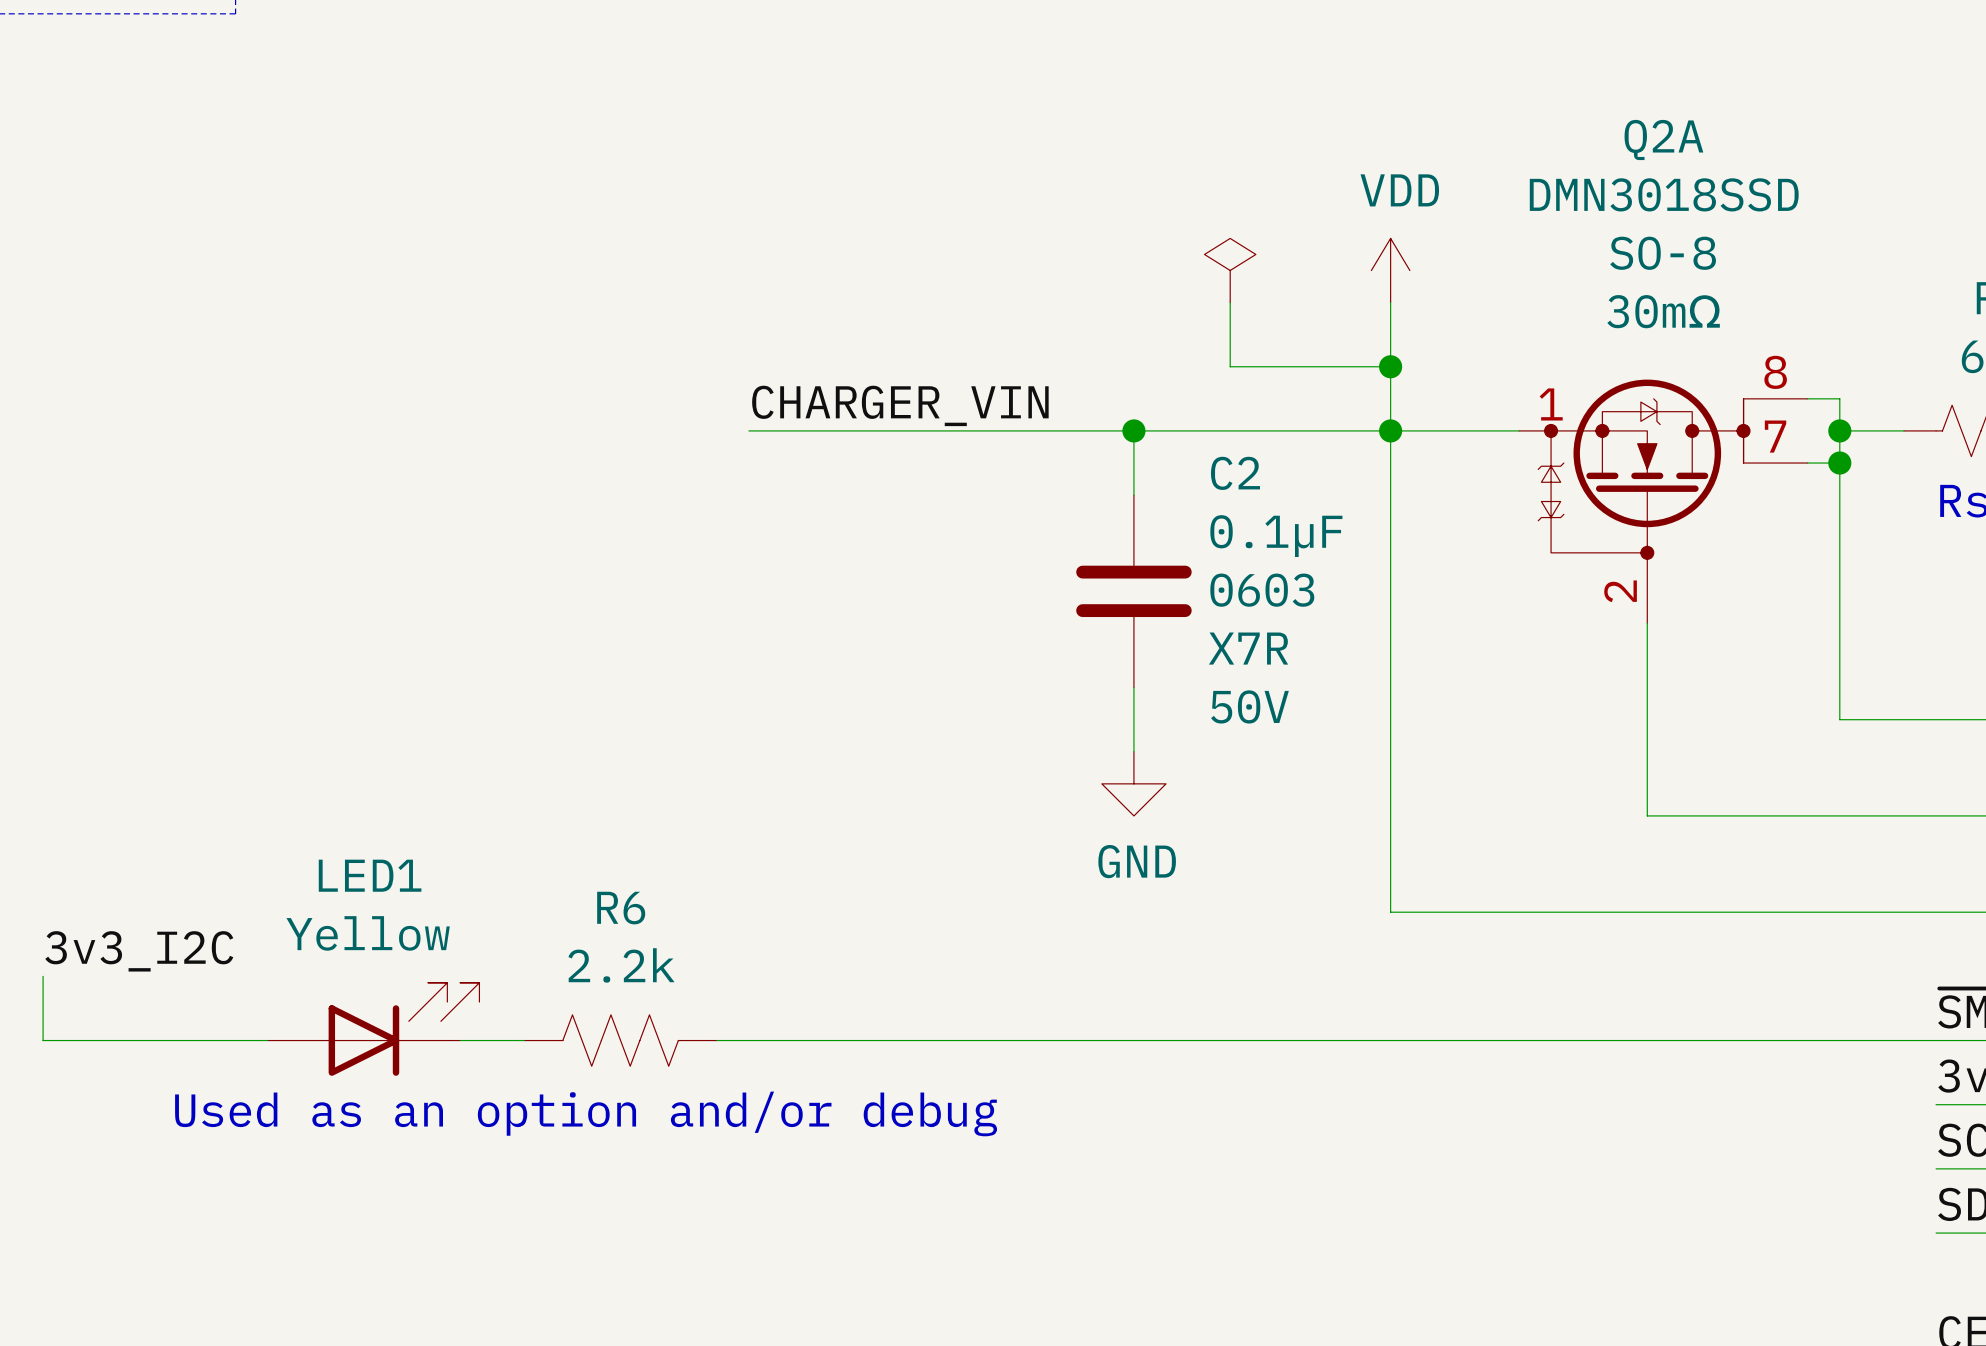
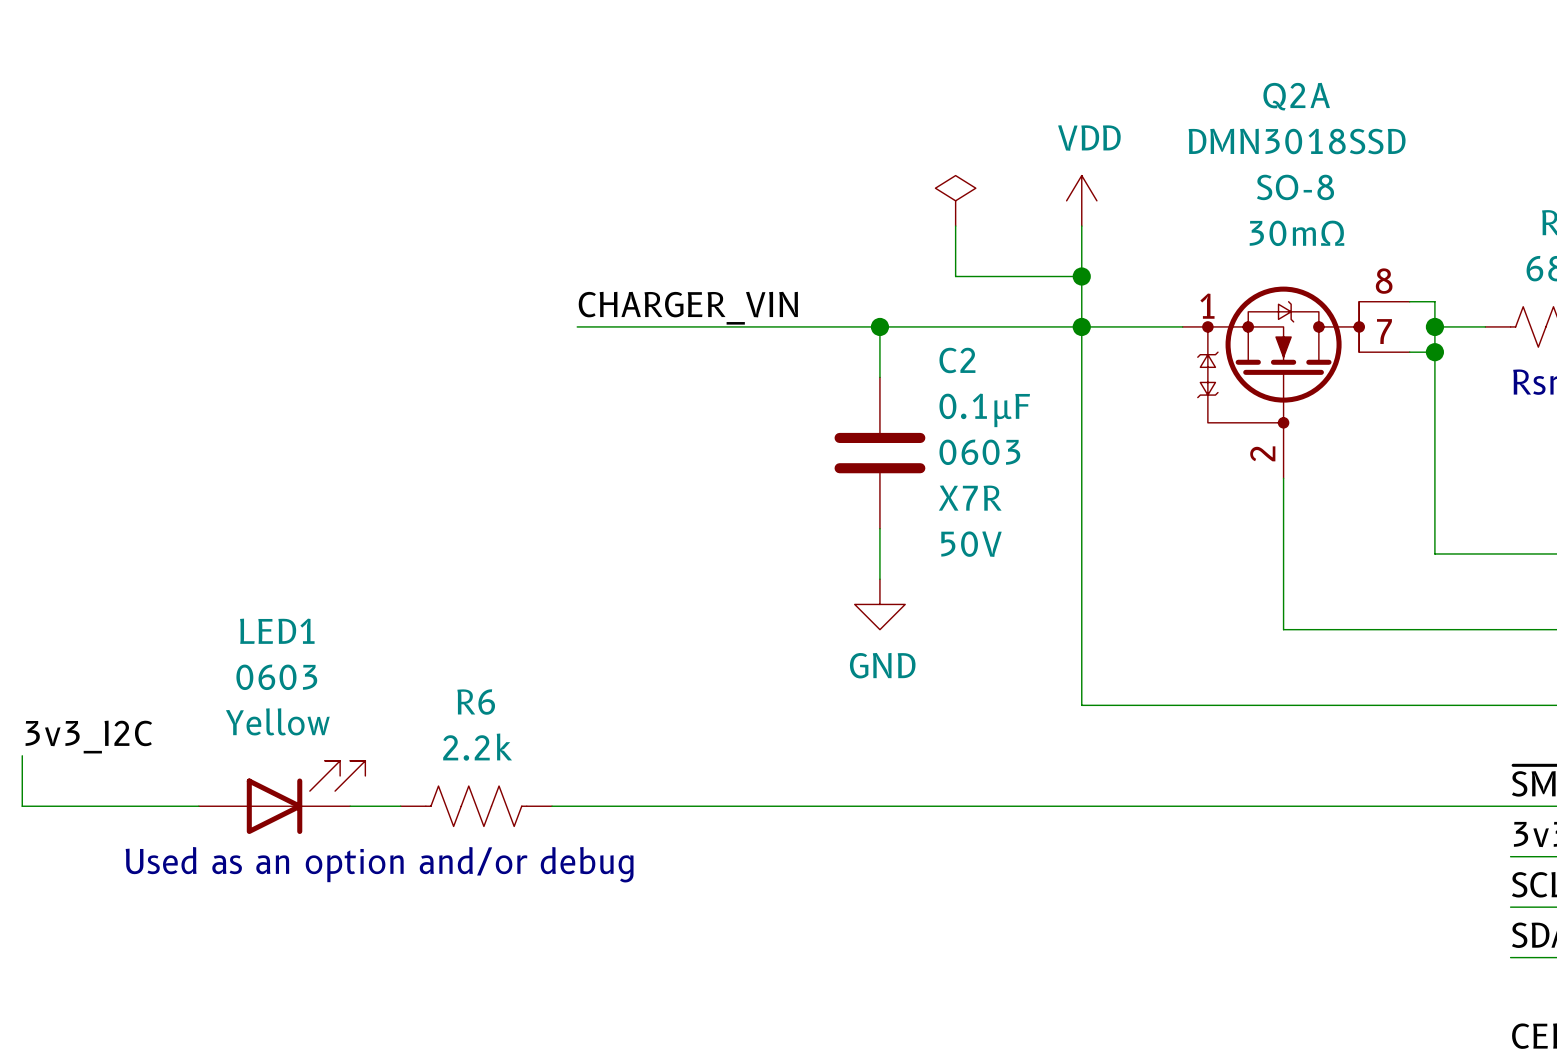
LED1 name position: LED1 (370, 875) -> LED1 (277, 631)
LED1 text: none -> 0603 (276, 677)

